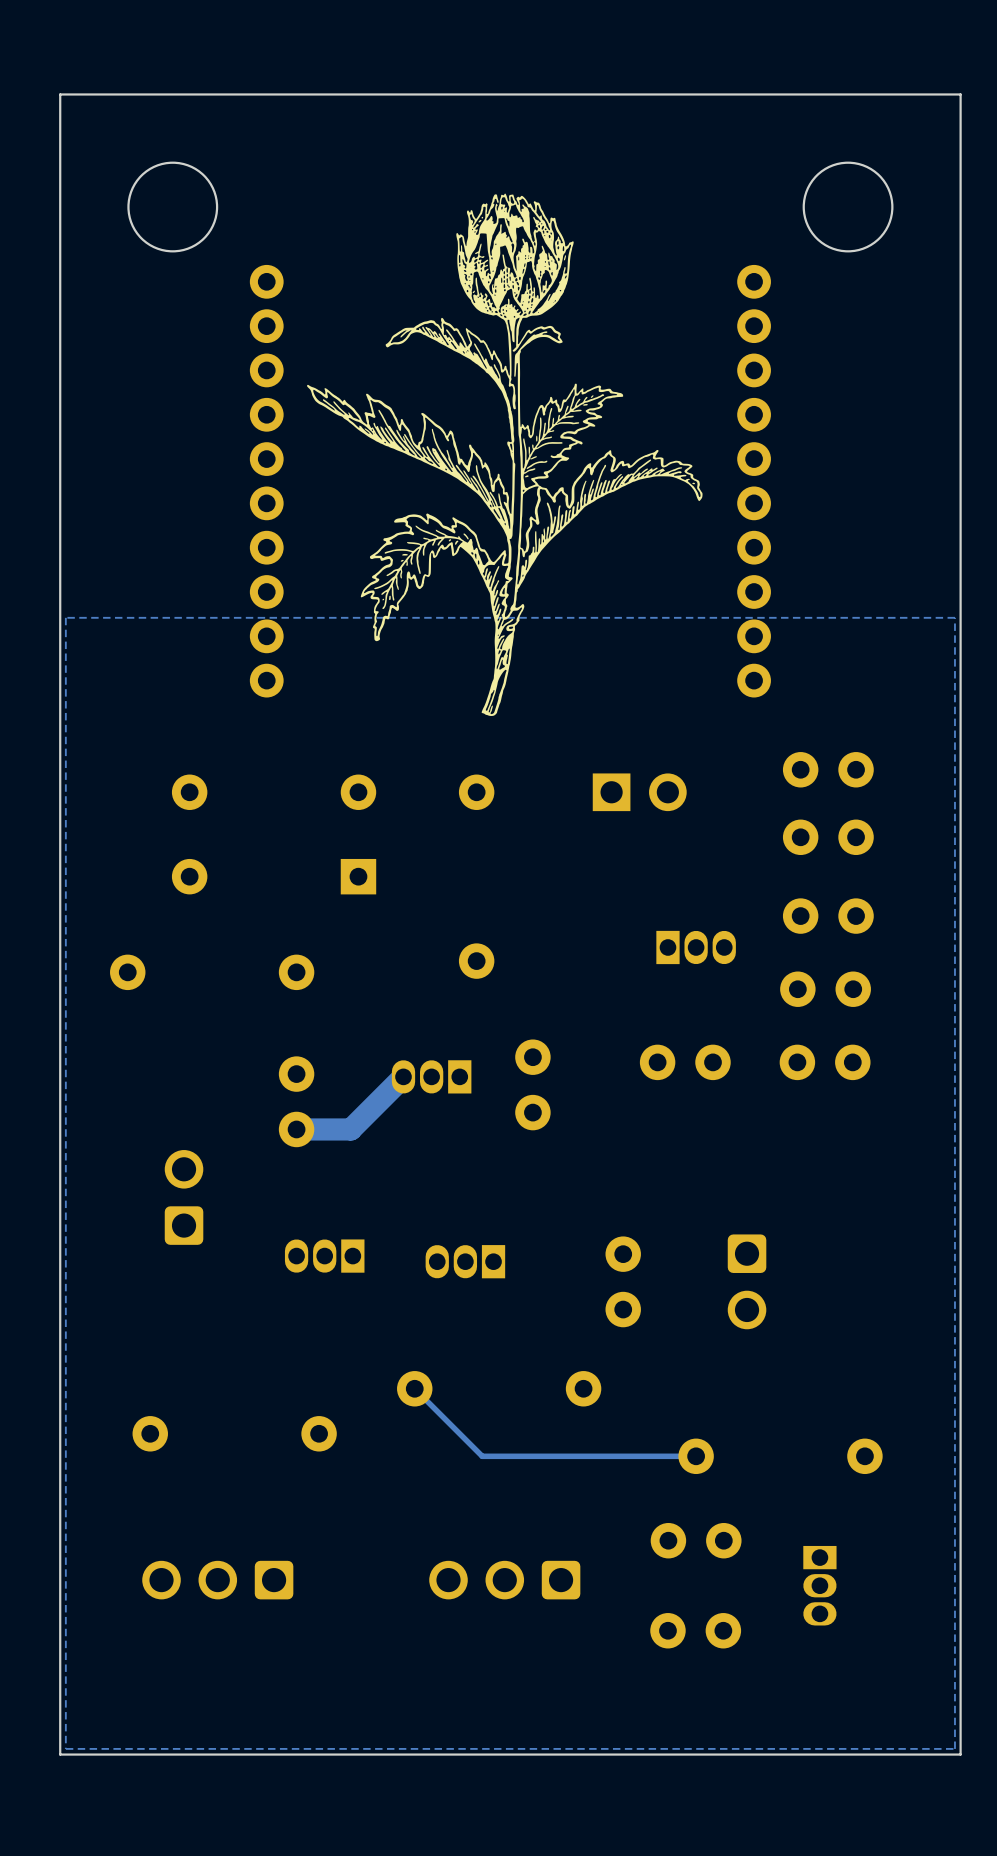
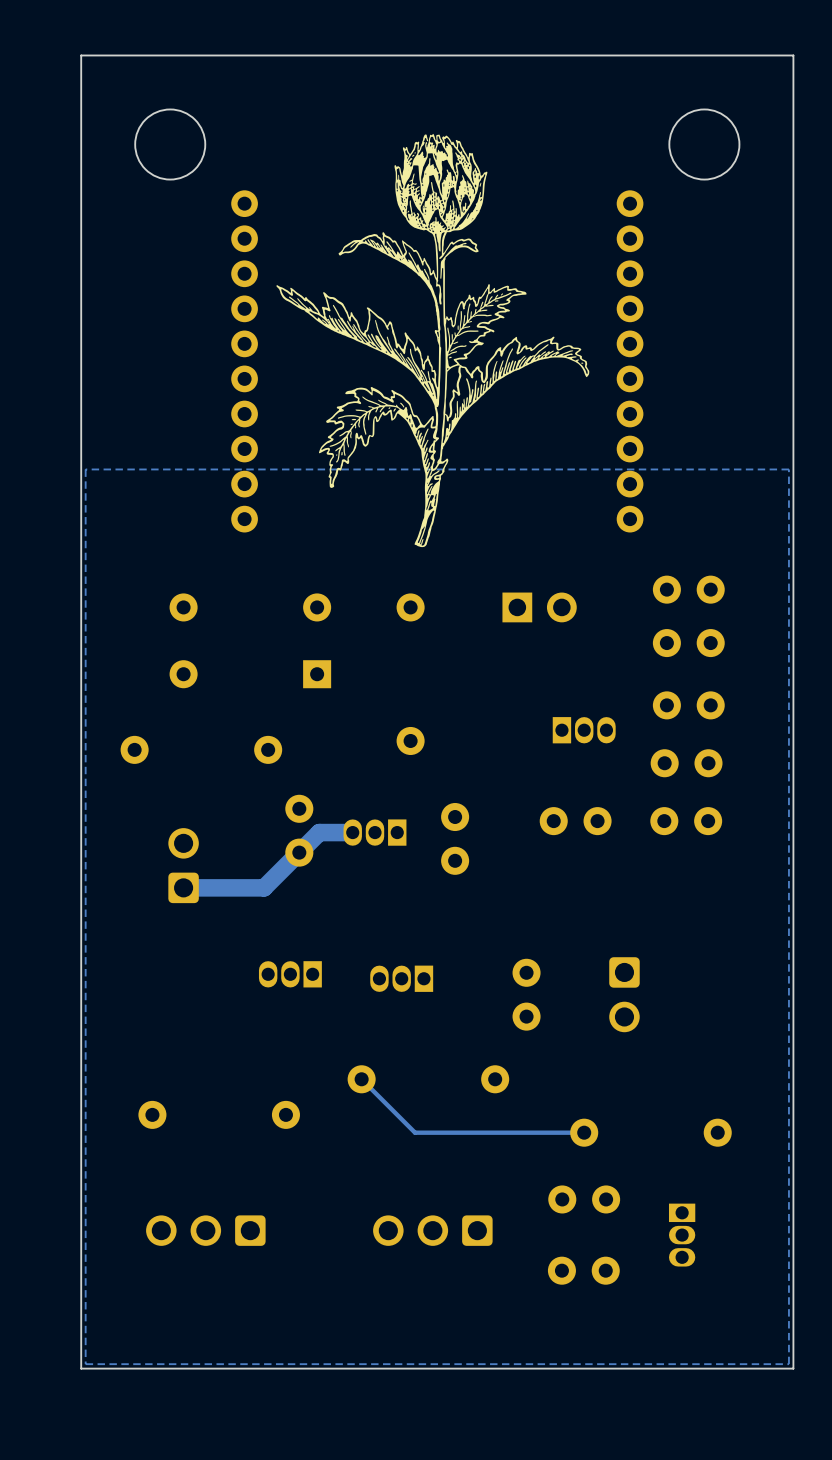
track: (403, 1076) (350, 1129) (296, 1129) -> (352, 832) (319, 832) (264, 887) (183, 887)
part position: (296, 1101) -> (299, 830)
part position: (184, 1197) -> (183, 865)

